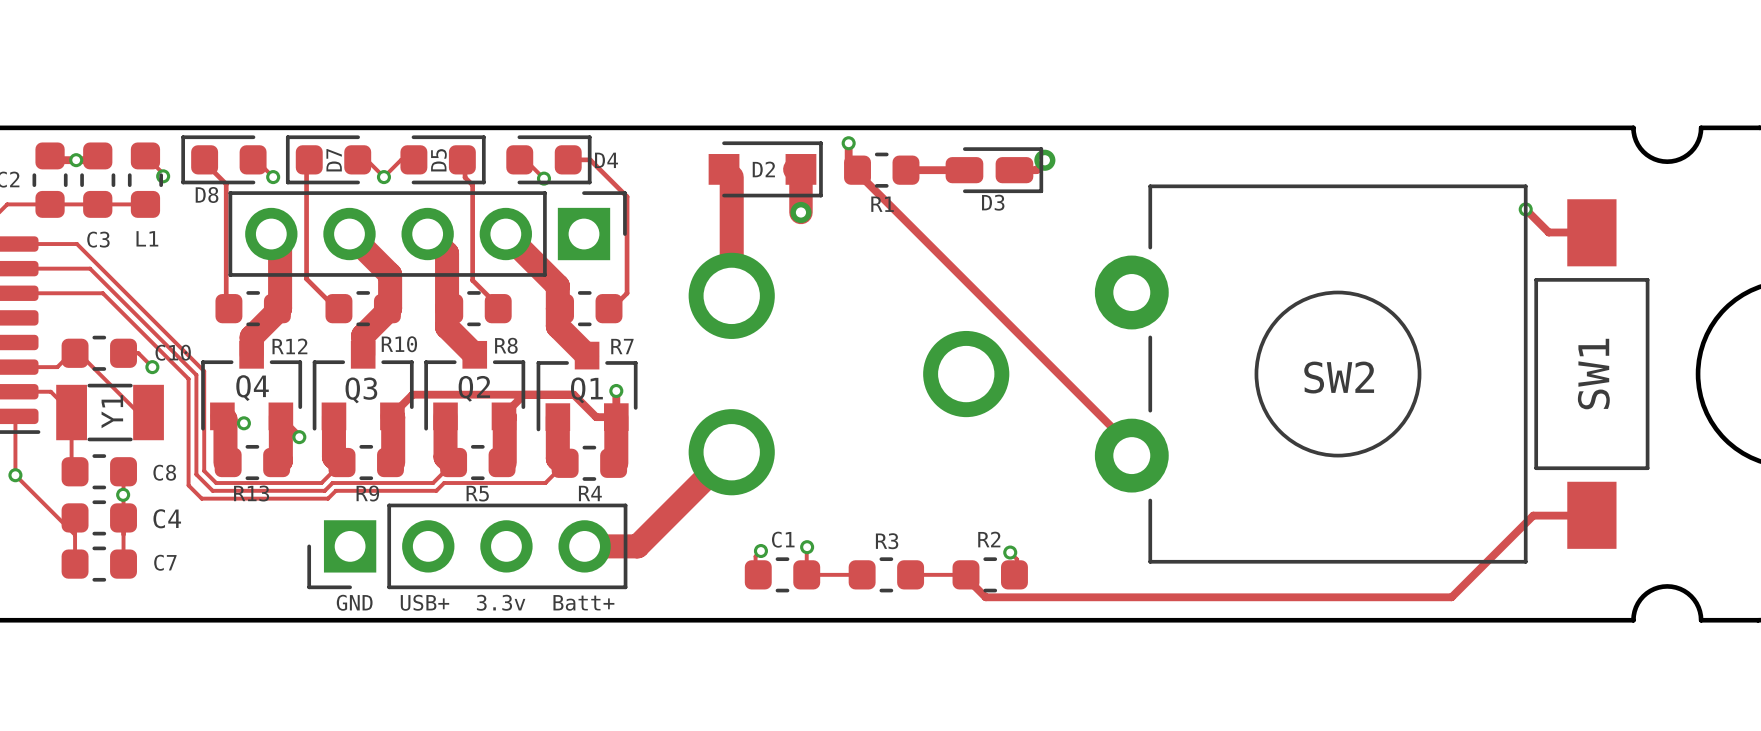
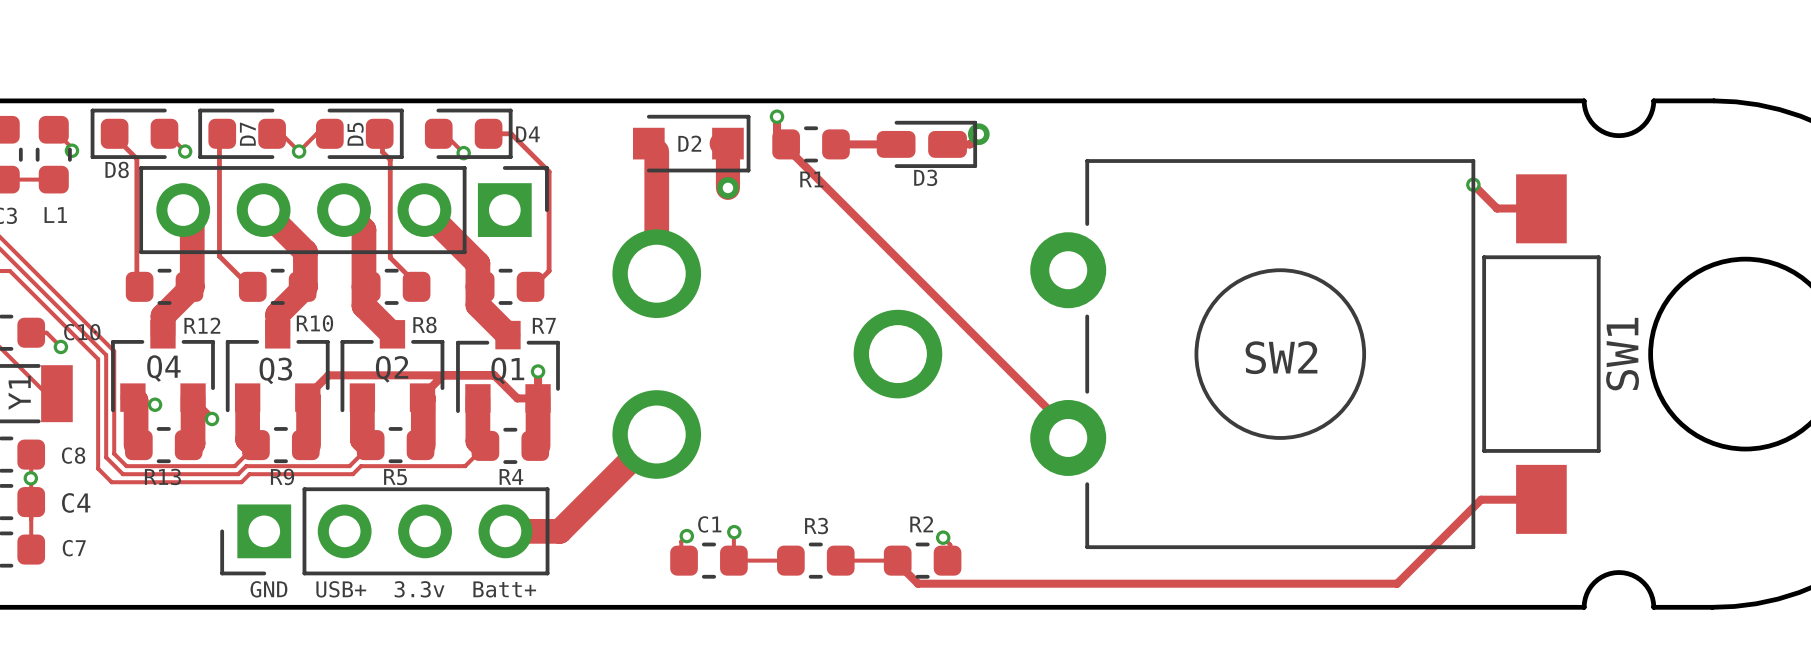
SW1 name position: SW1 (1593, 374) -> SW1 (1622, 354)

